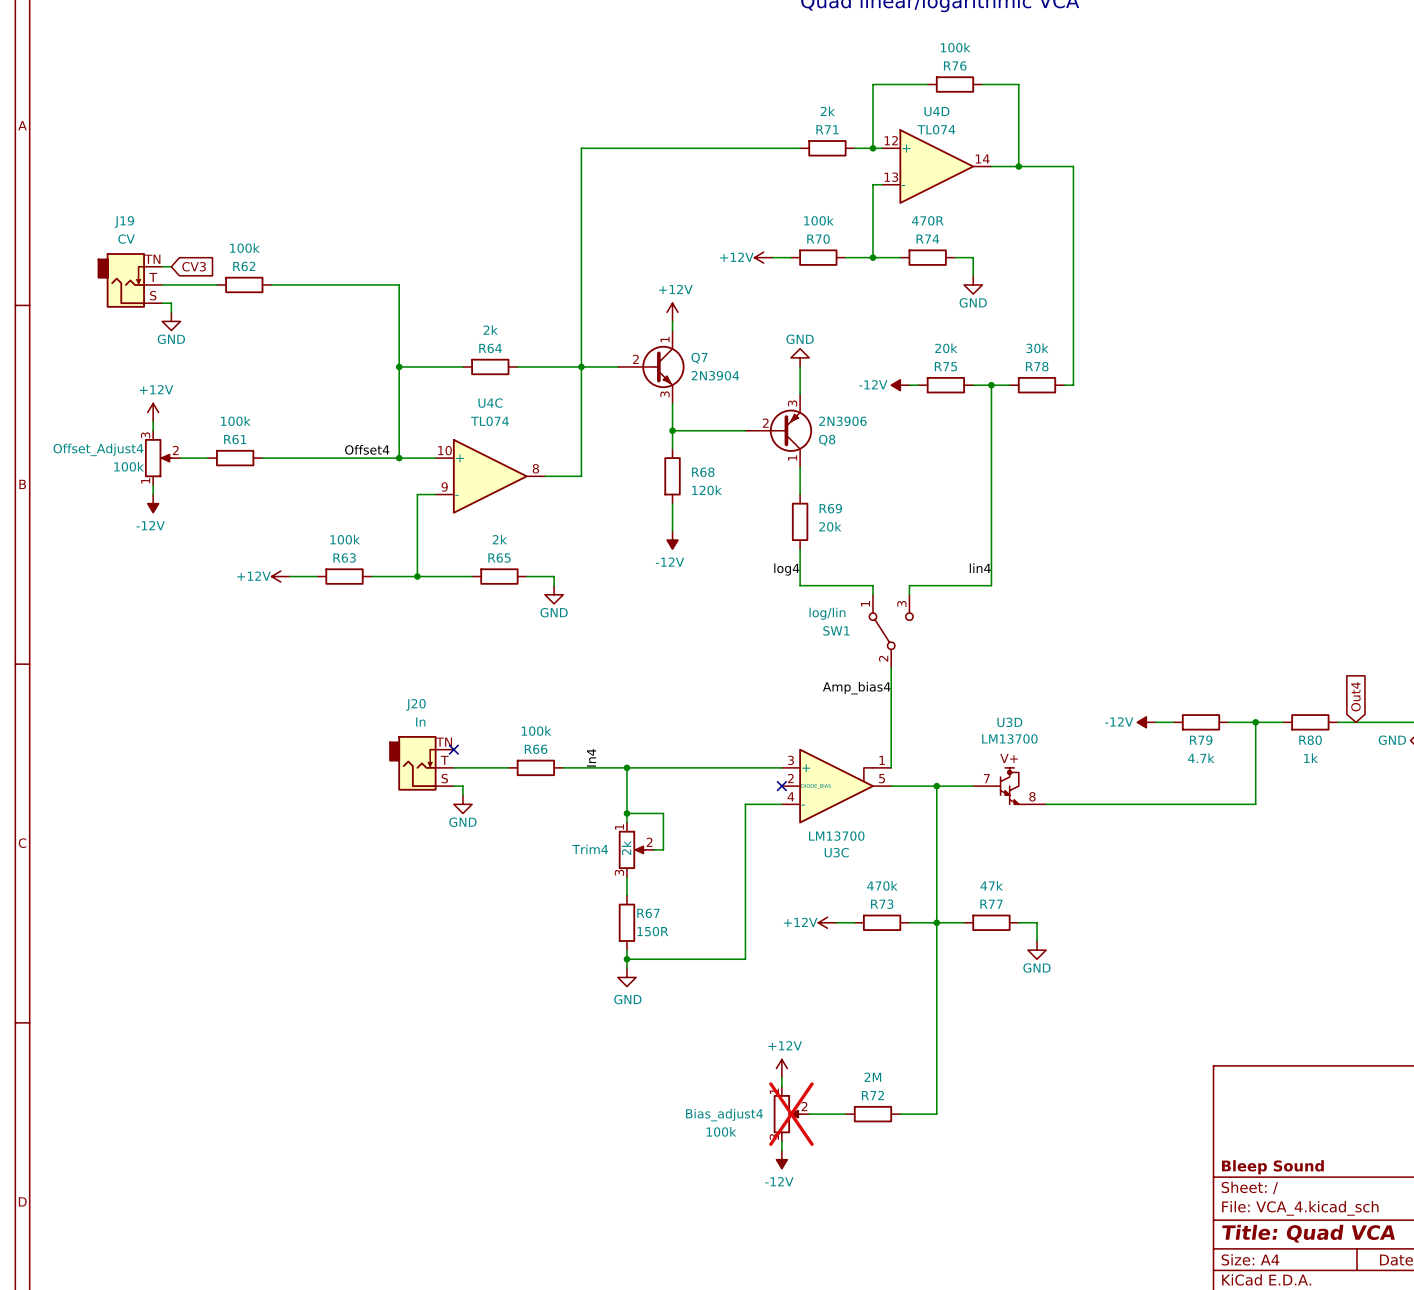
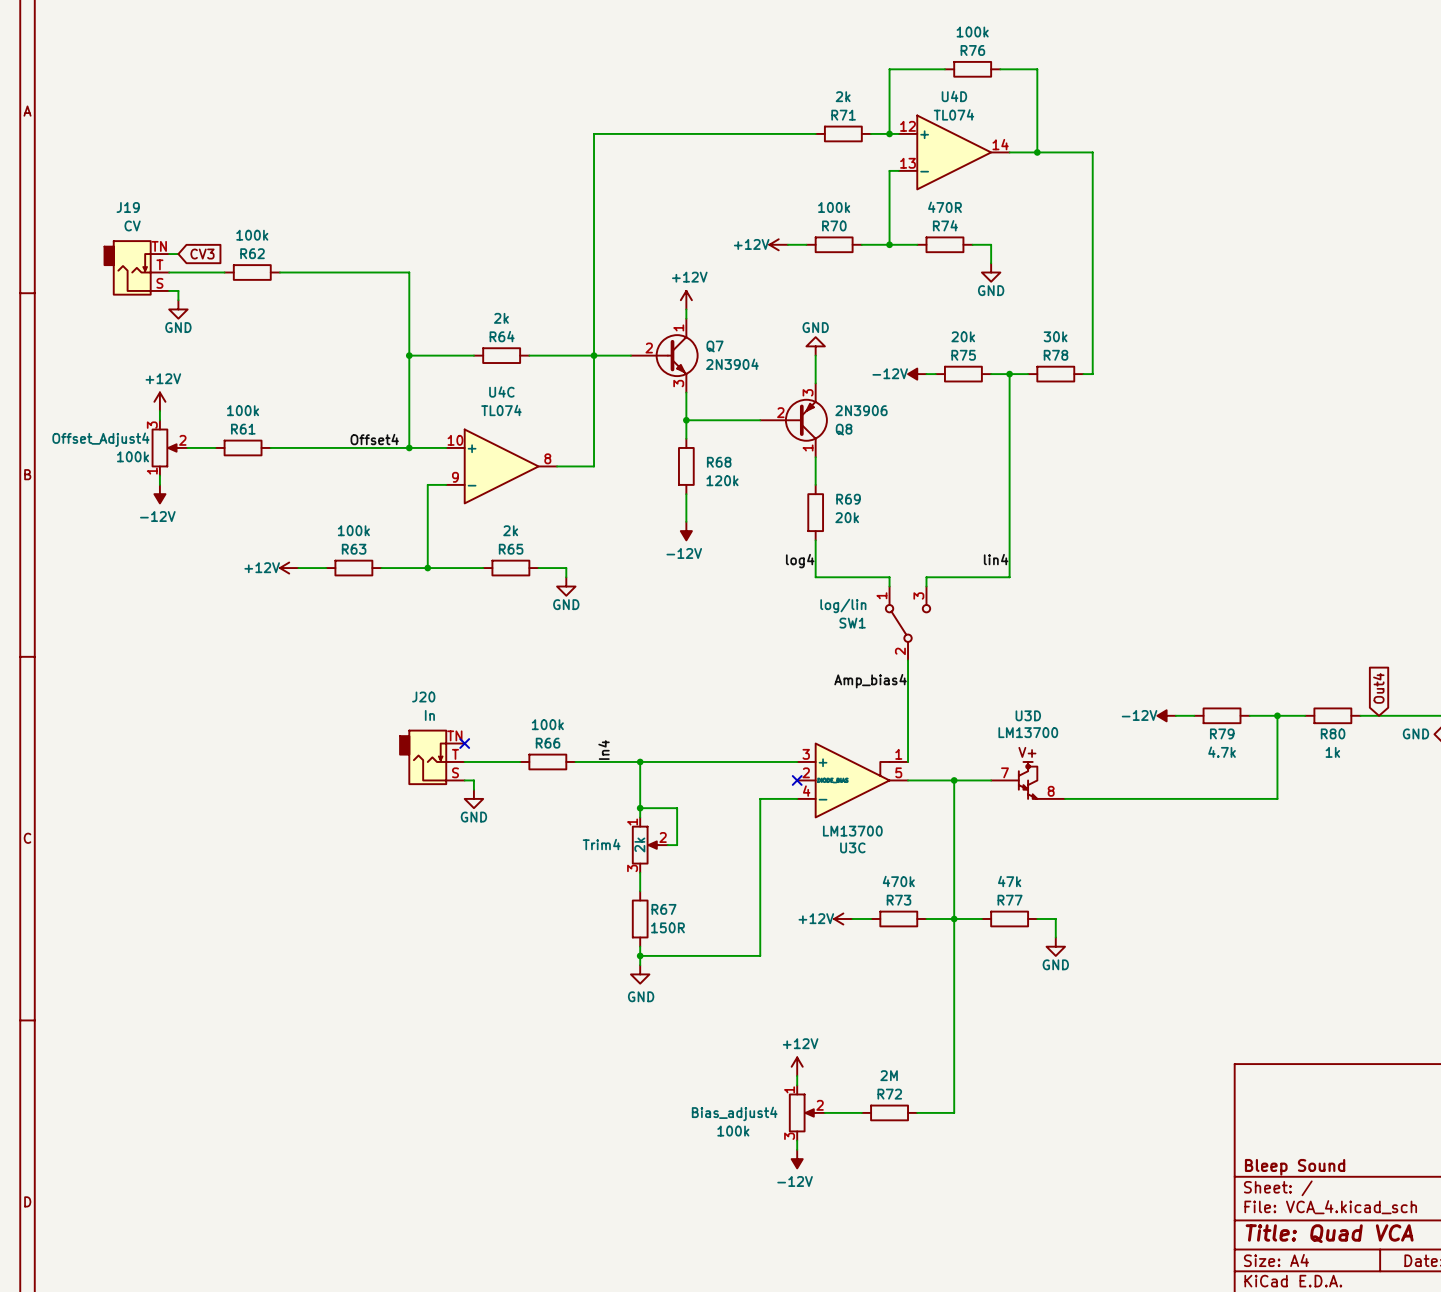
Bias_adjust4 do-not-place cross: (791, 1114) -> none

